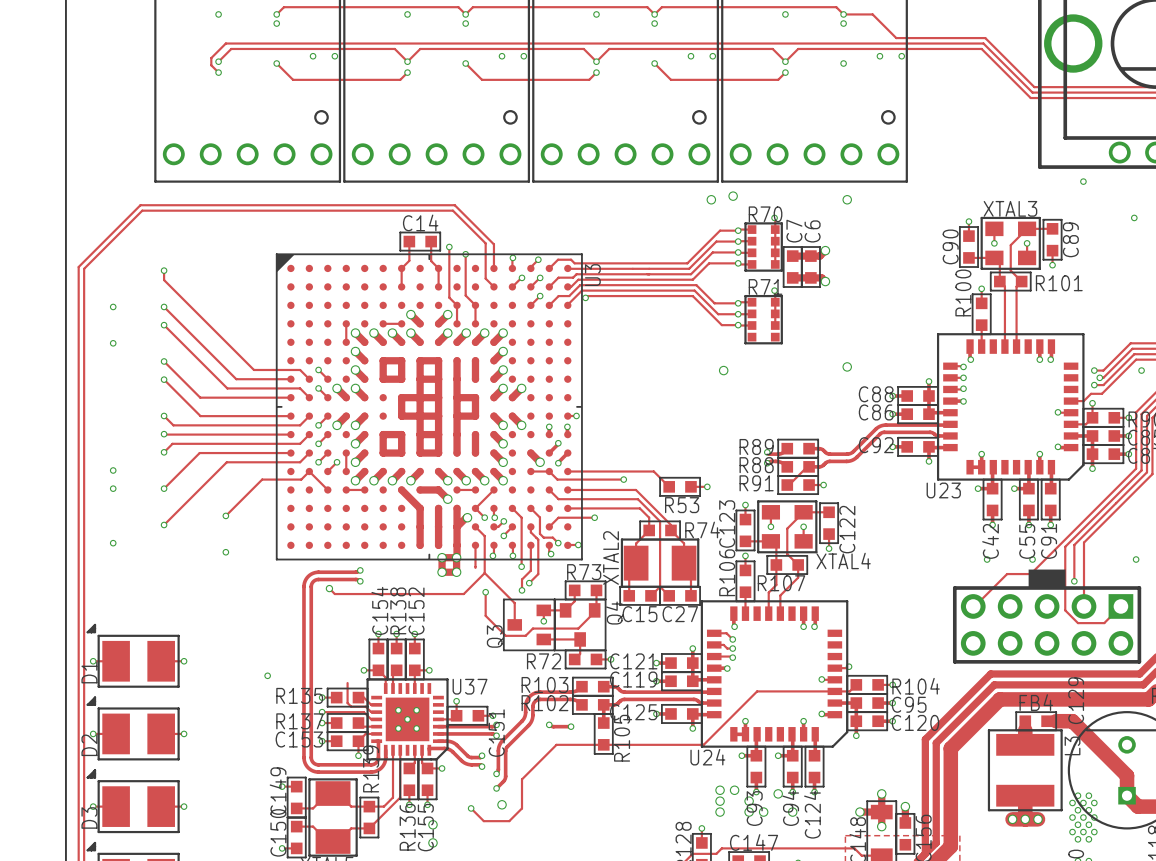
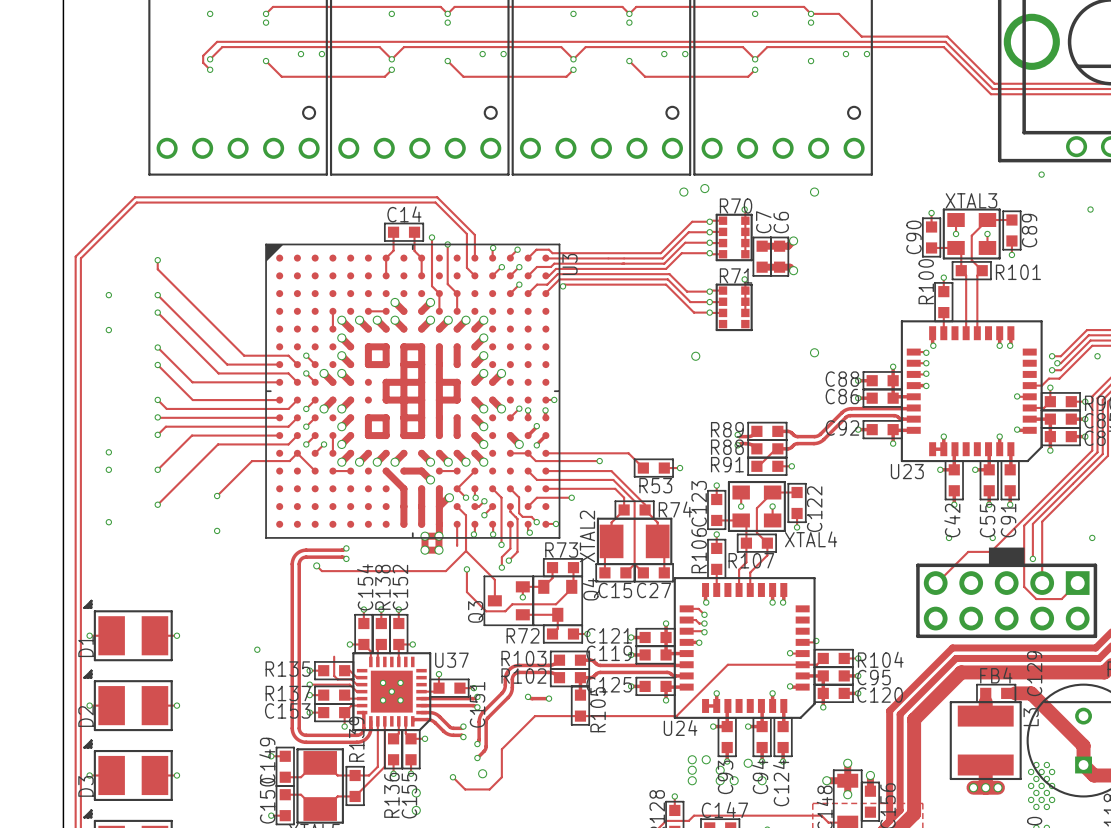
track: none -> (519, 408) (510, 417)
via: none -> (519, 408)

